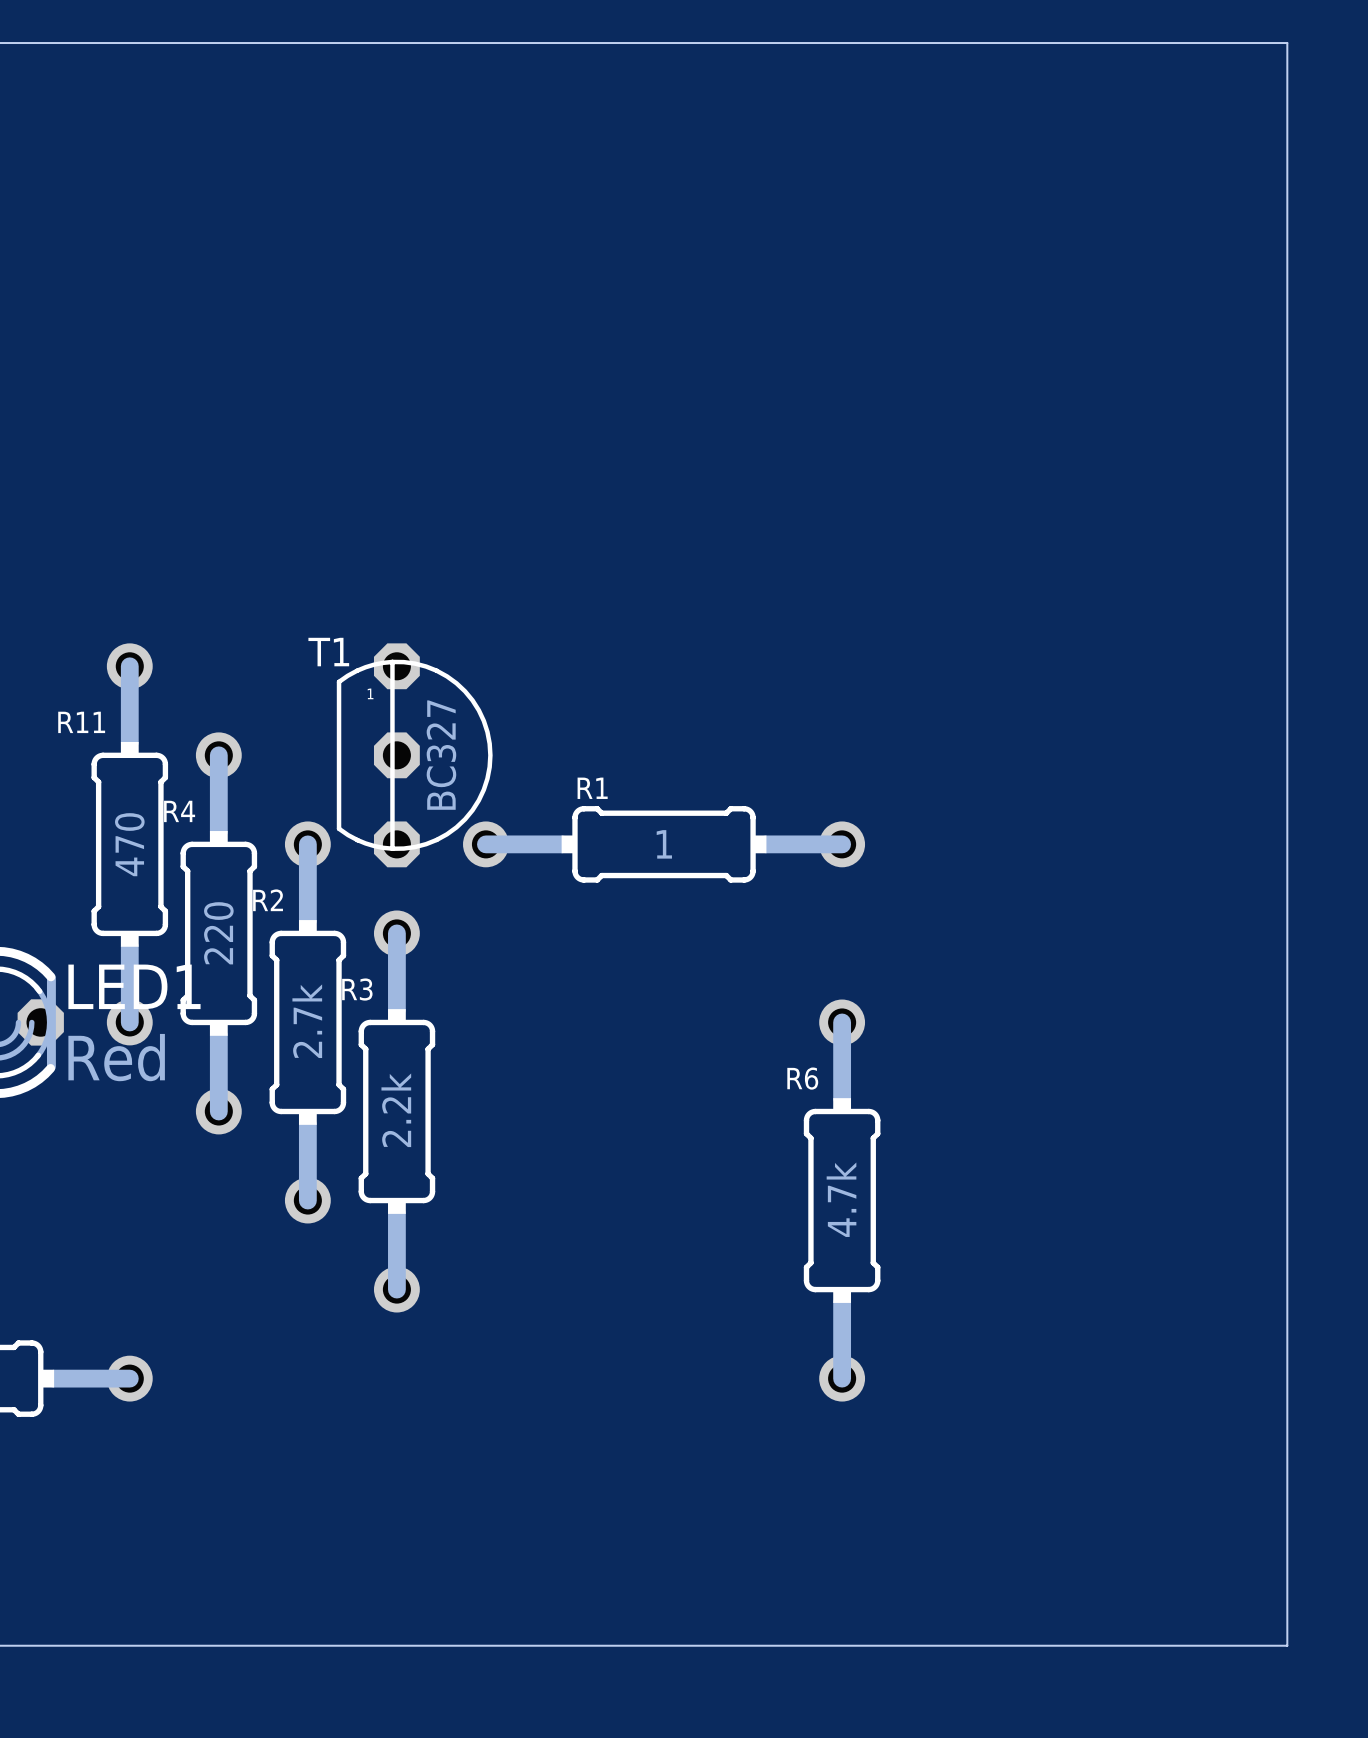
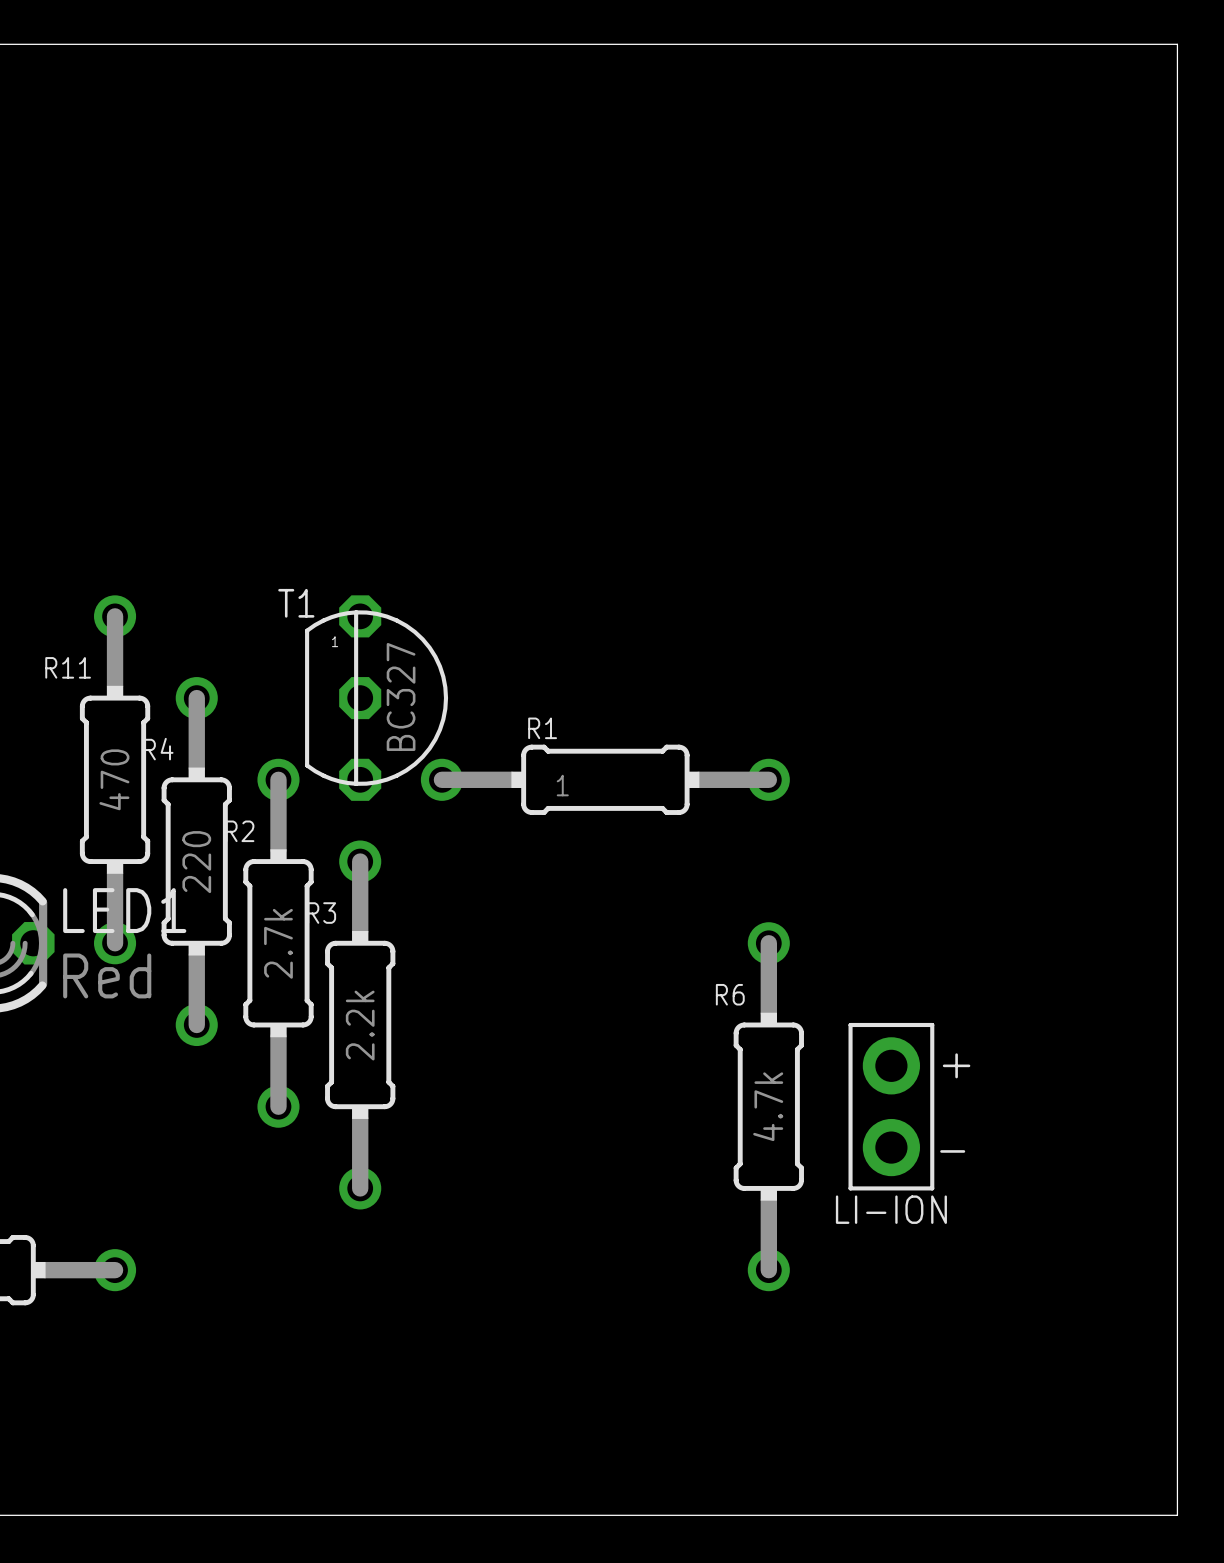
R1 value position: 1 (664, 844) -> 1 (562, 785)
LI-ION: none -> (891, 1106)

